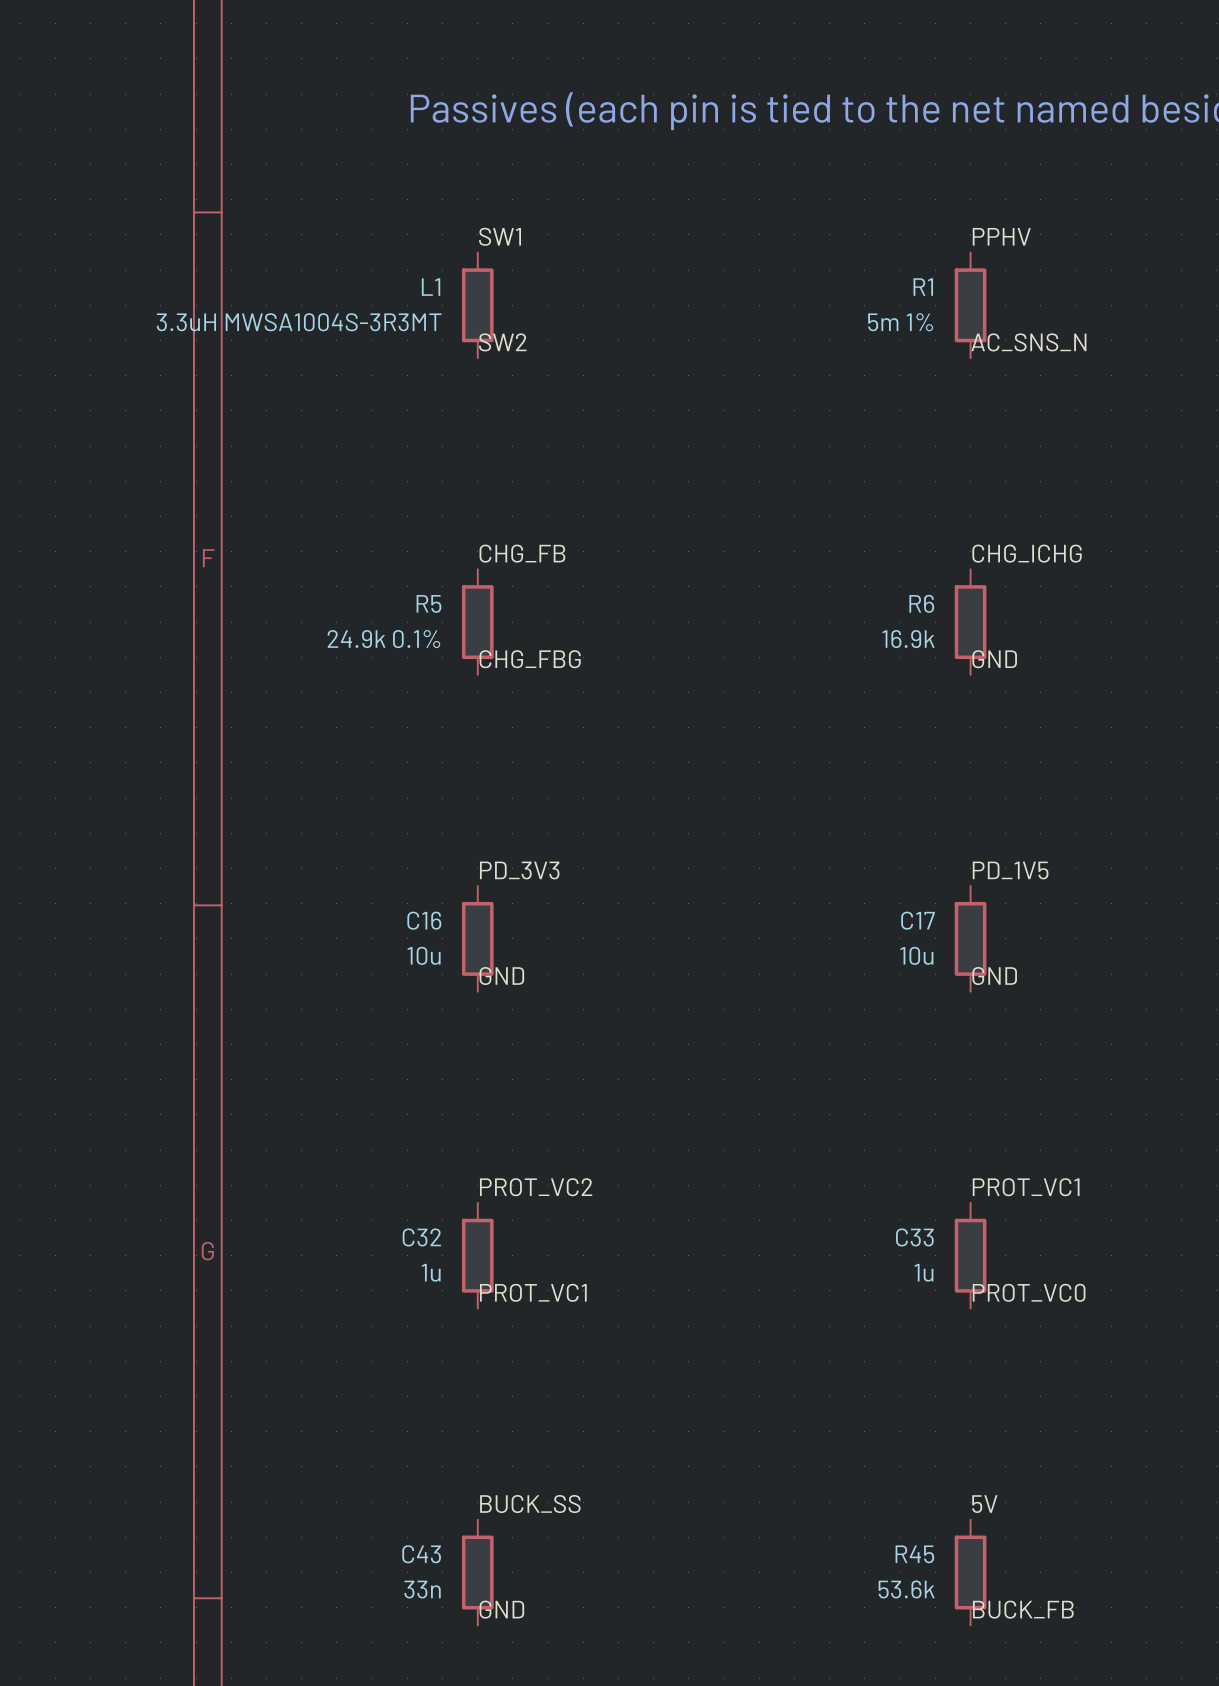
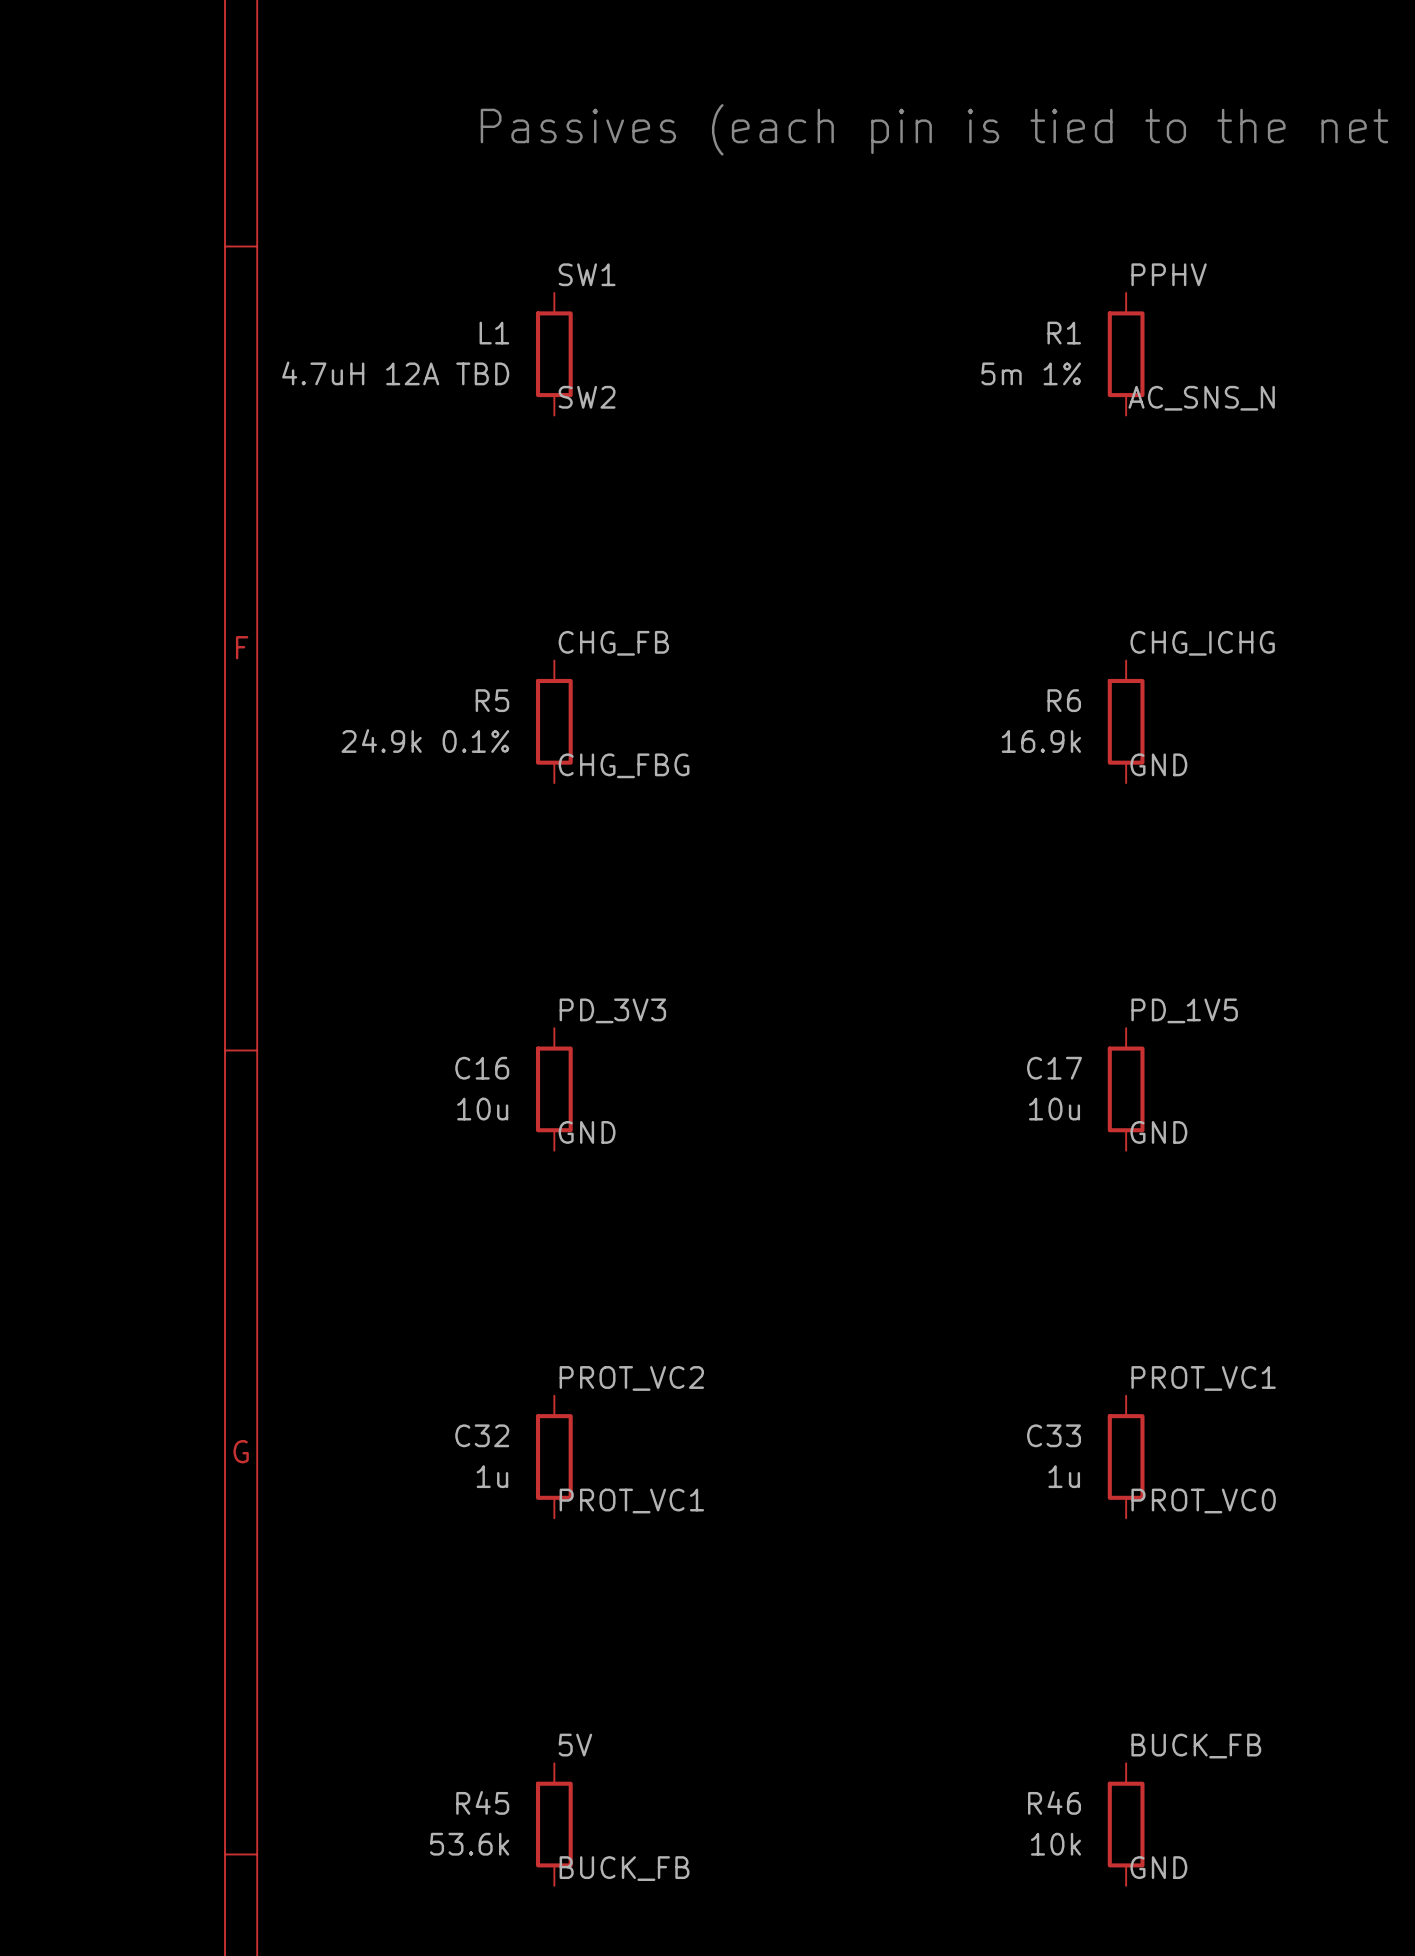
L1 value: 3.3uH MWSA1004S-3R3MT (299, 322) -> 4.7uH 12A TBD (395, 373)
label: BUCK_SS (530, 1504) -> 5V (575, 1745)
label: 5V (984, 1504) -> BUCK_FB (1196, 1746)
C43 name: C43 (421, 1554) -> R45 (482, 1802)
R45 name: R45 (914, 1554) -> R46 (1054, 1802)
C43 value: 33n (422, 1589) -> 53.6k (469, 1844)
R45 value: 53.6k (906, 1589) -> 10k (1055, 1844)
label: GND (501, 1609) -> BUCK_FB (624, 1868)
label: BUCK_FB (1023, 1609) -> GND (1158, 1867)

